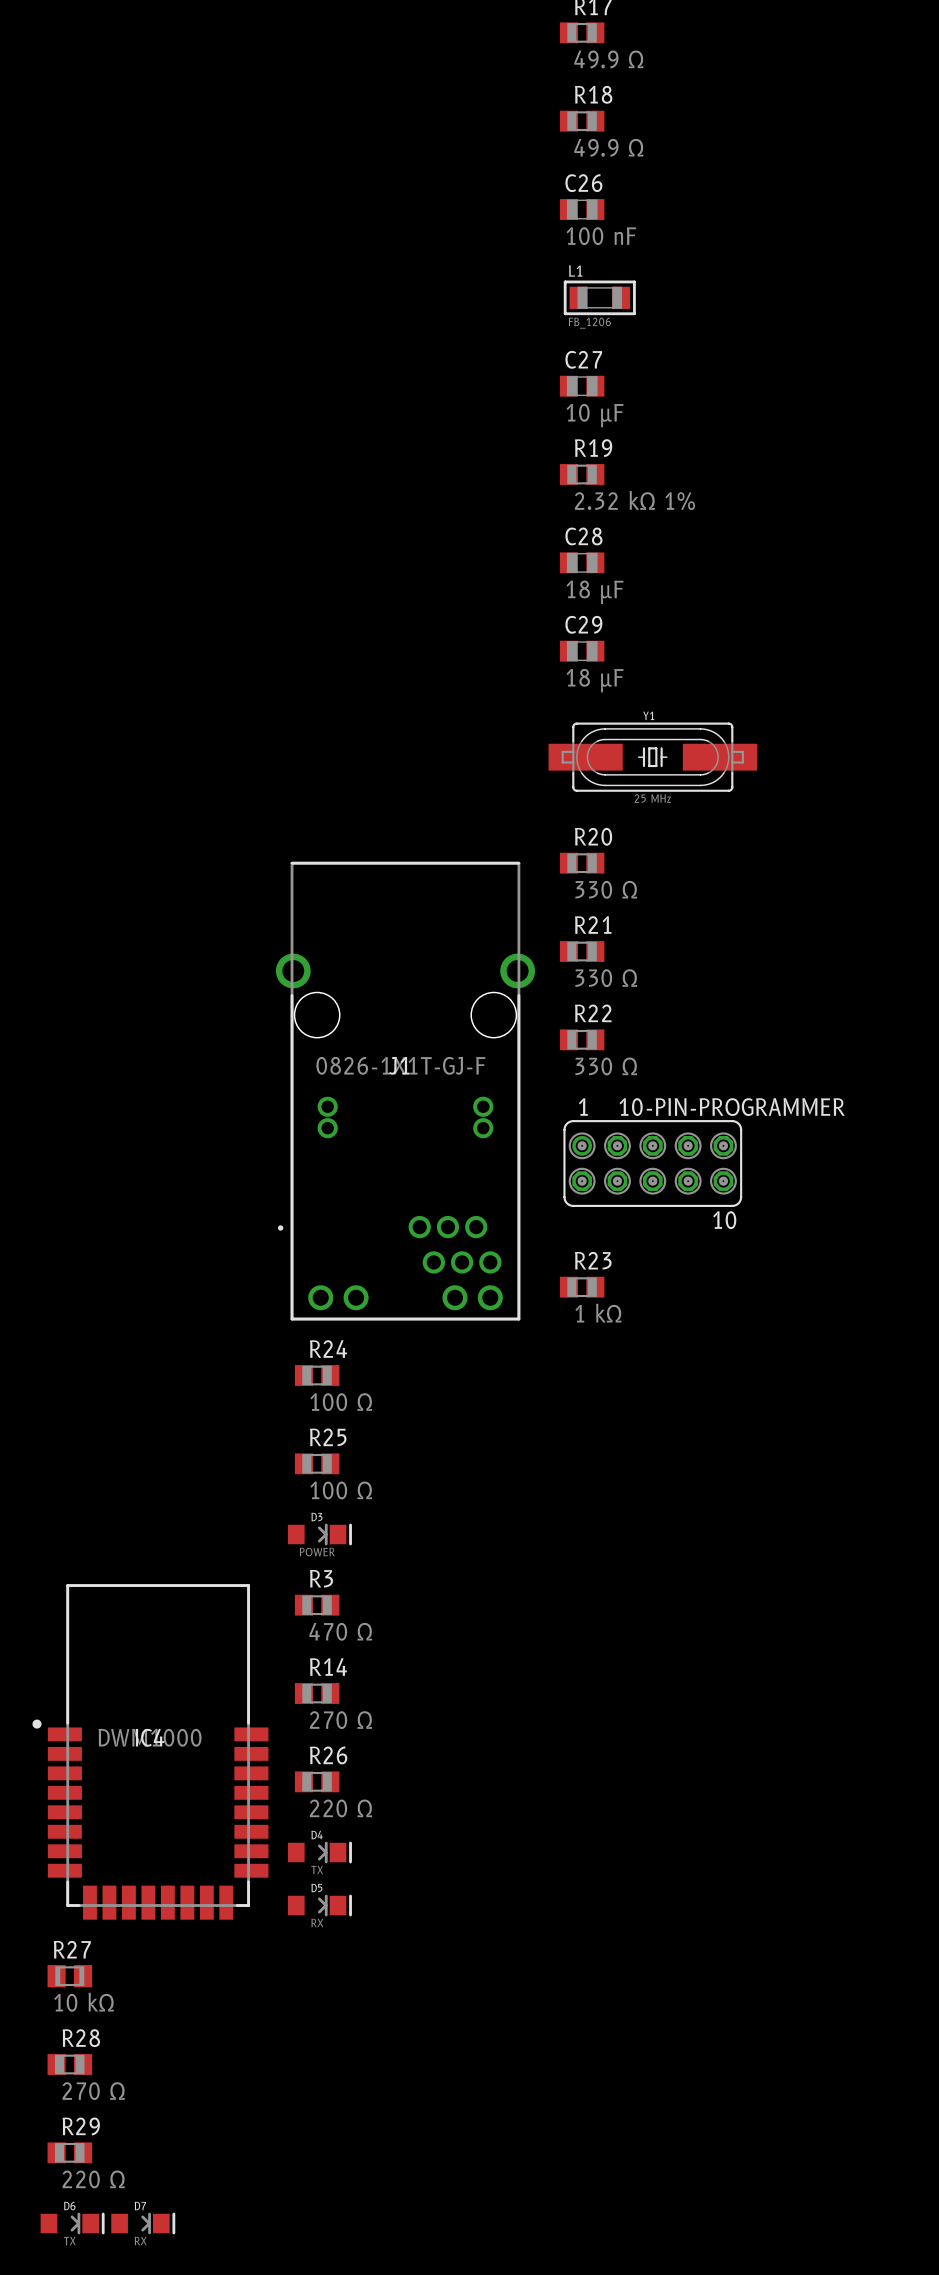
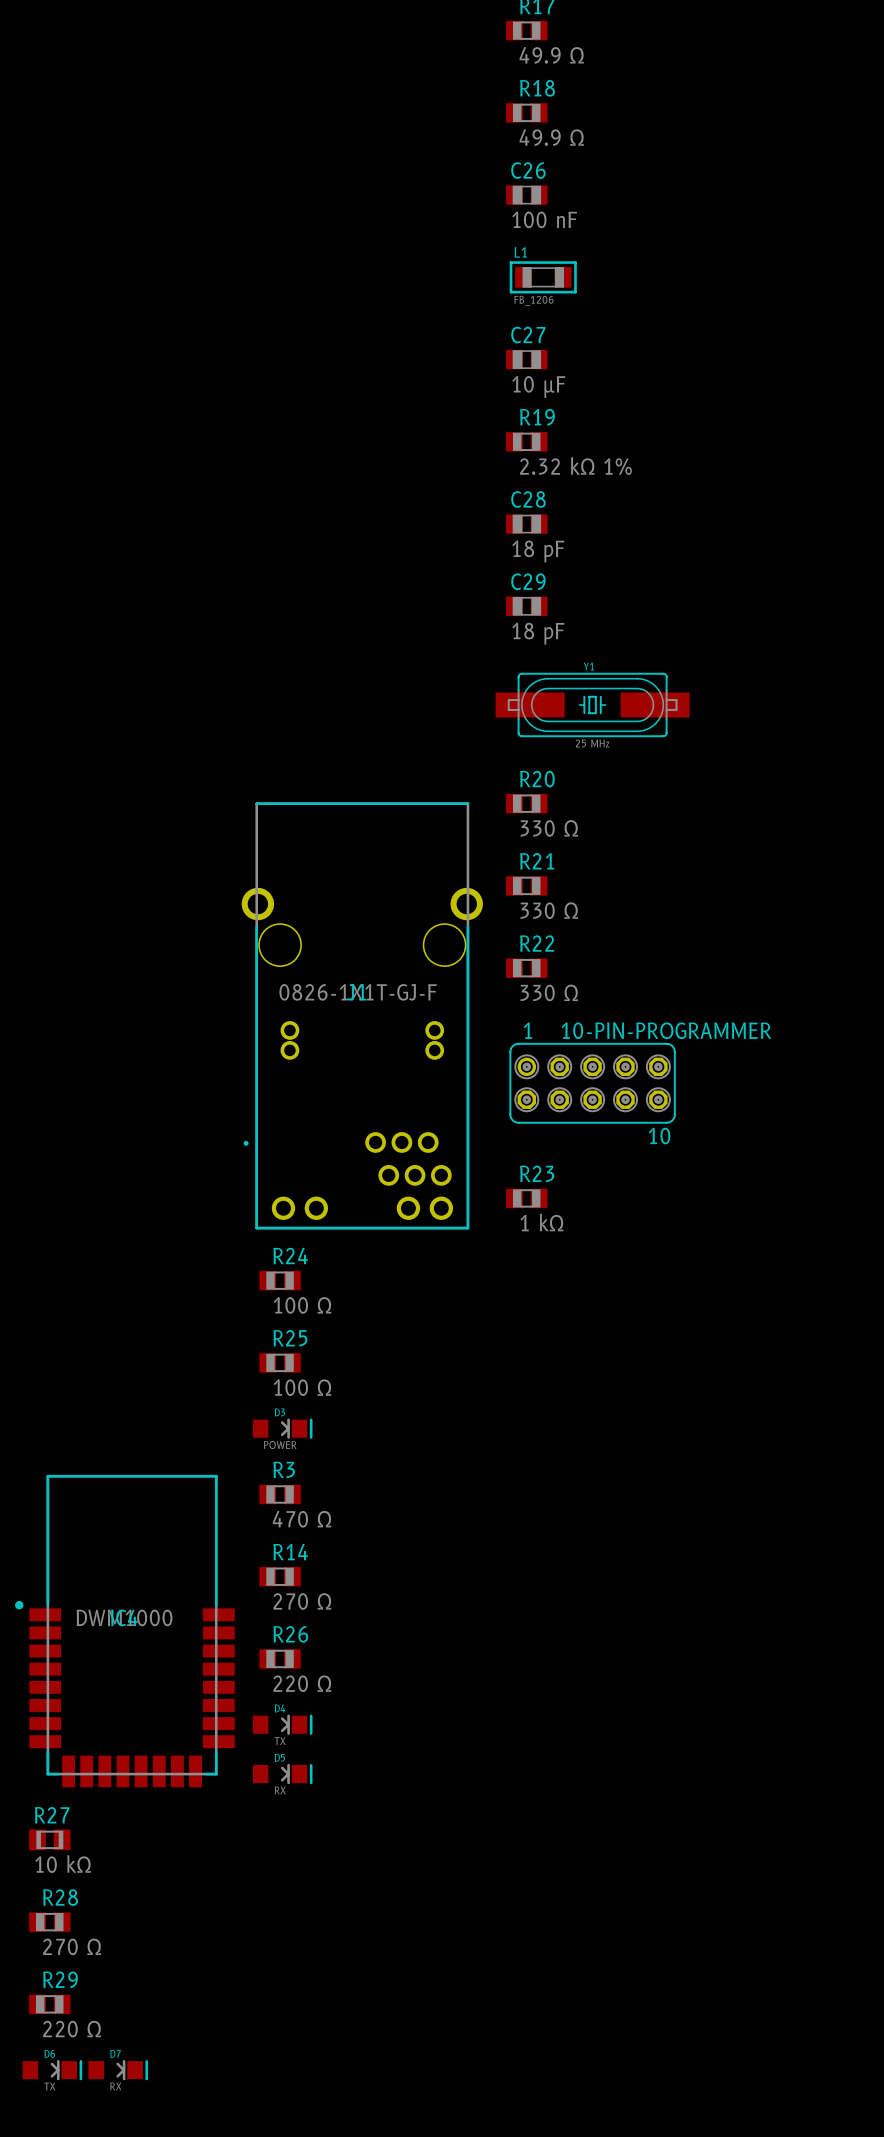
C28 value: 18 µF (595, 592) -> 18 pF (538, 551)
C29 value: 18 µF (595, 680) -> 18 pF (538, 633)

